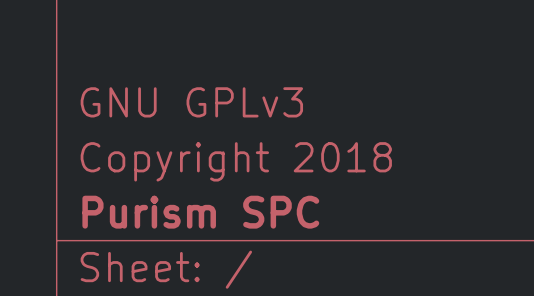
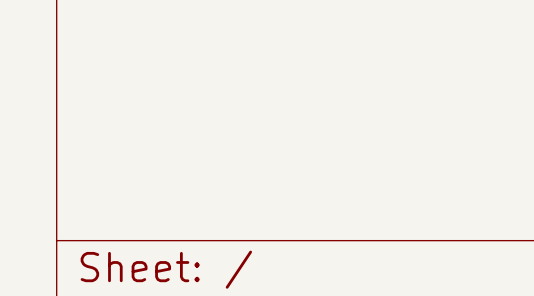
title block: GNU GPLv3 (191, 102) -> none
title block: Copyright 2018 (236, 161) -> none
title block: Purism SPC (200, 212) -> none

